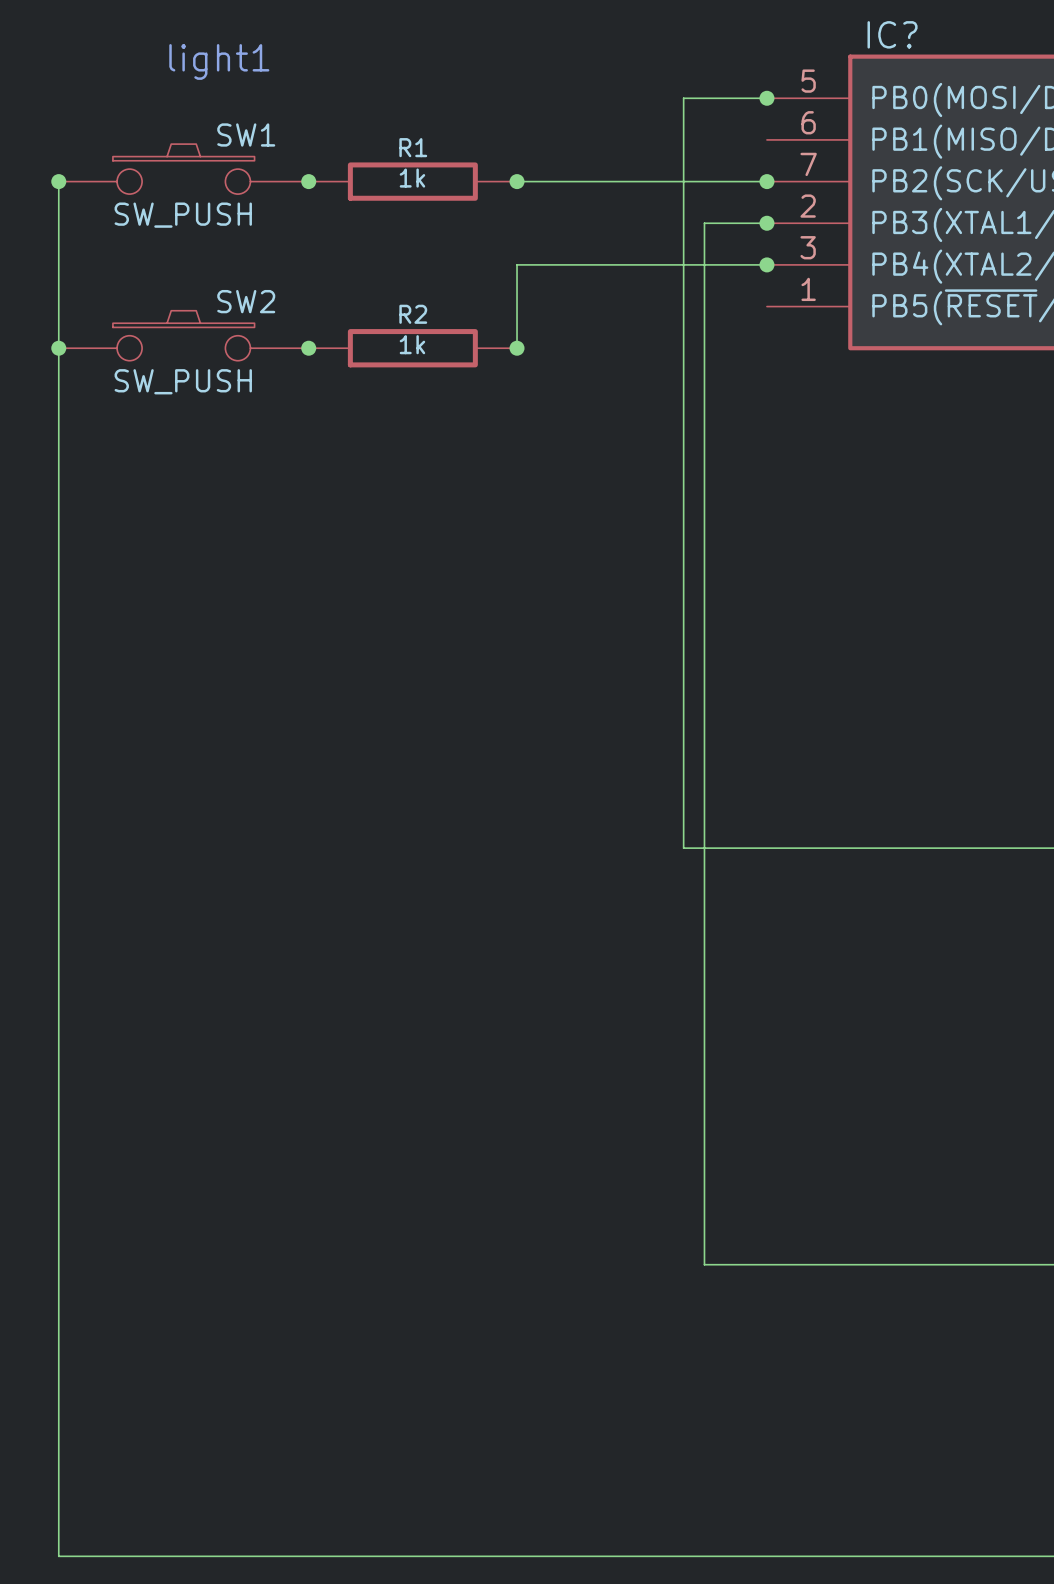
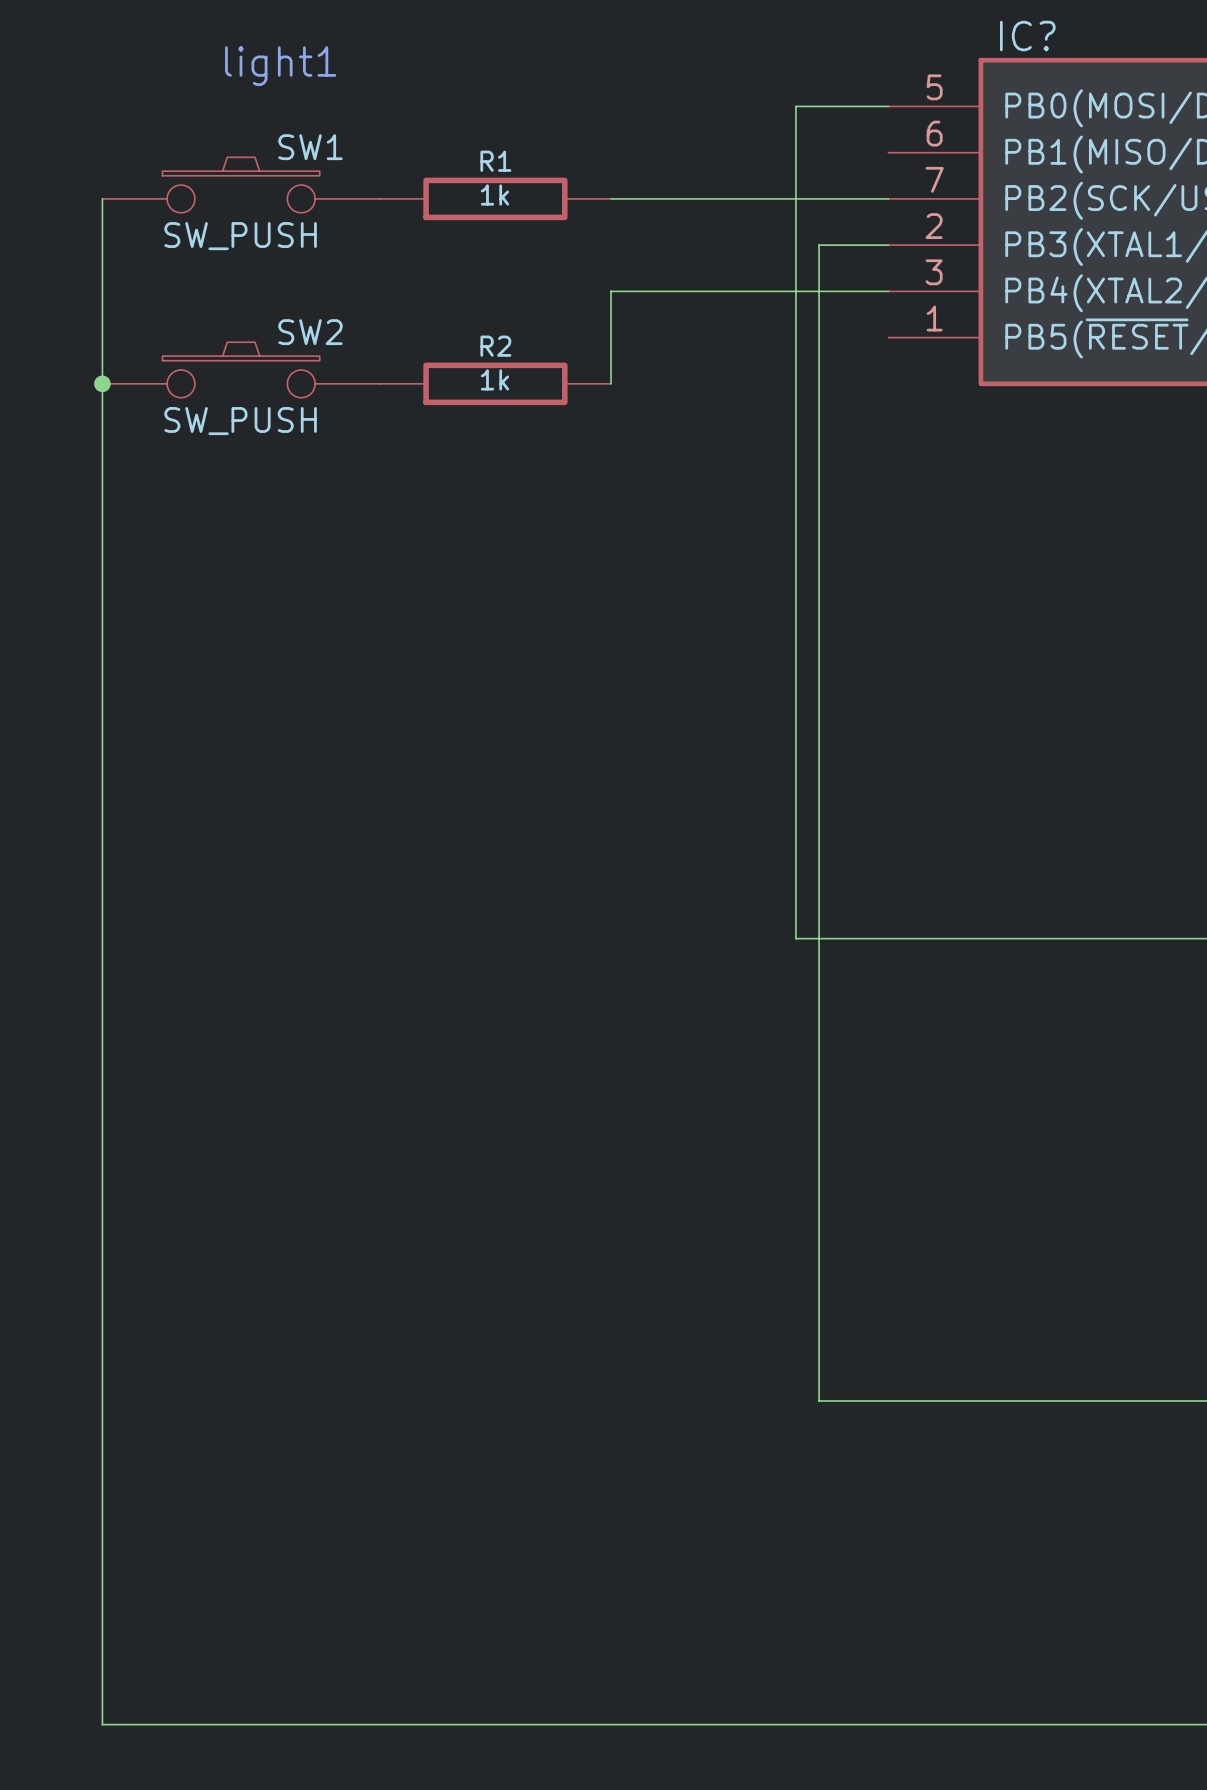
junction: (766, 98) -> none
junction: (58, 181) -> none
junction: (308, 181) -> none
junction: (517, 181) -> none
junction: (766, 181) -> none
junction: (766, 223) -> none
junction: (766, 264) -> none
junction: (308, 348) -> none
junction: (517, 348) -> none

